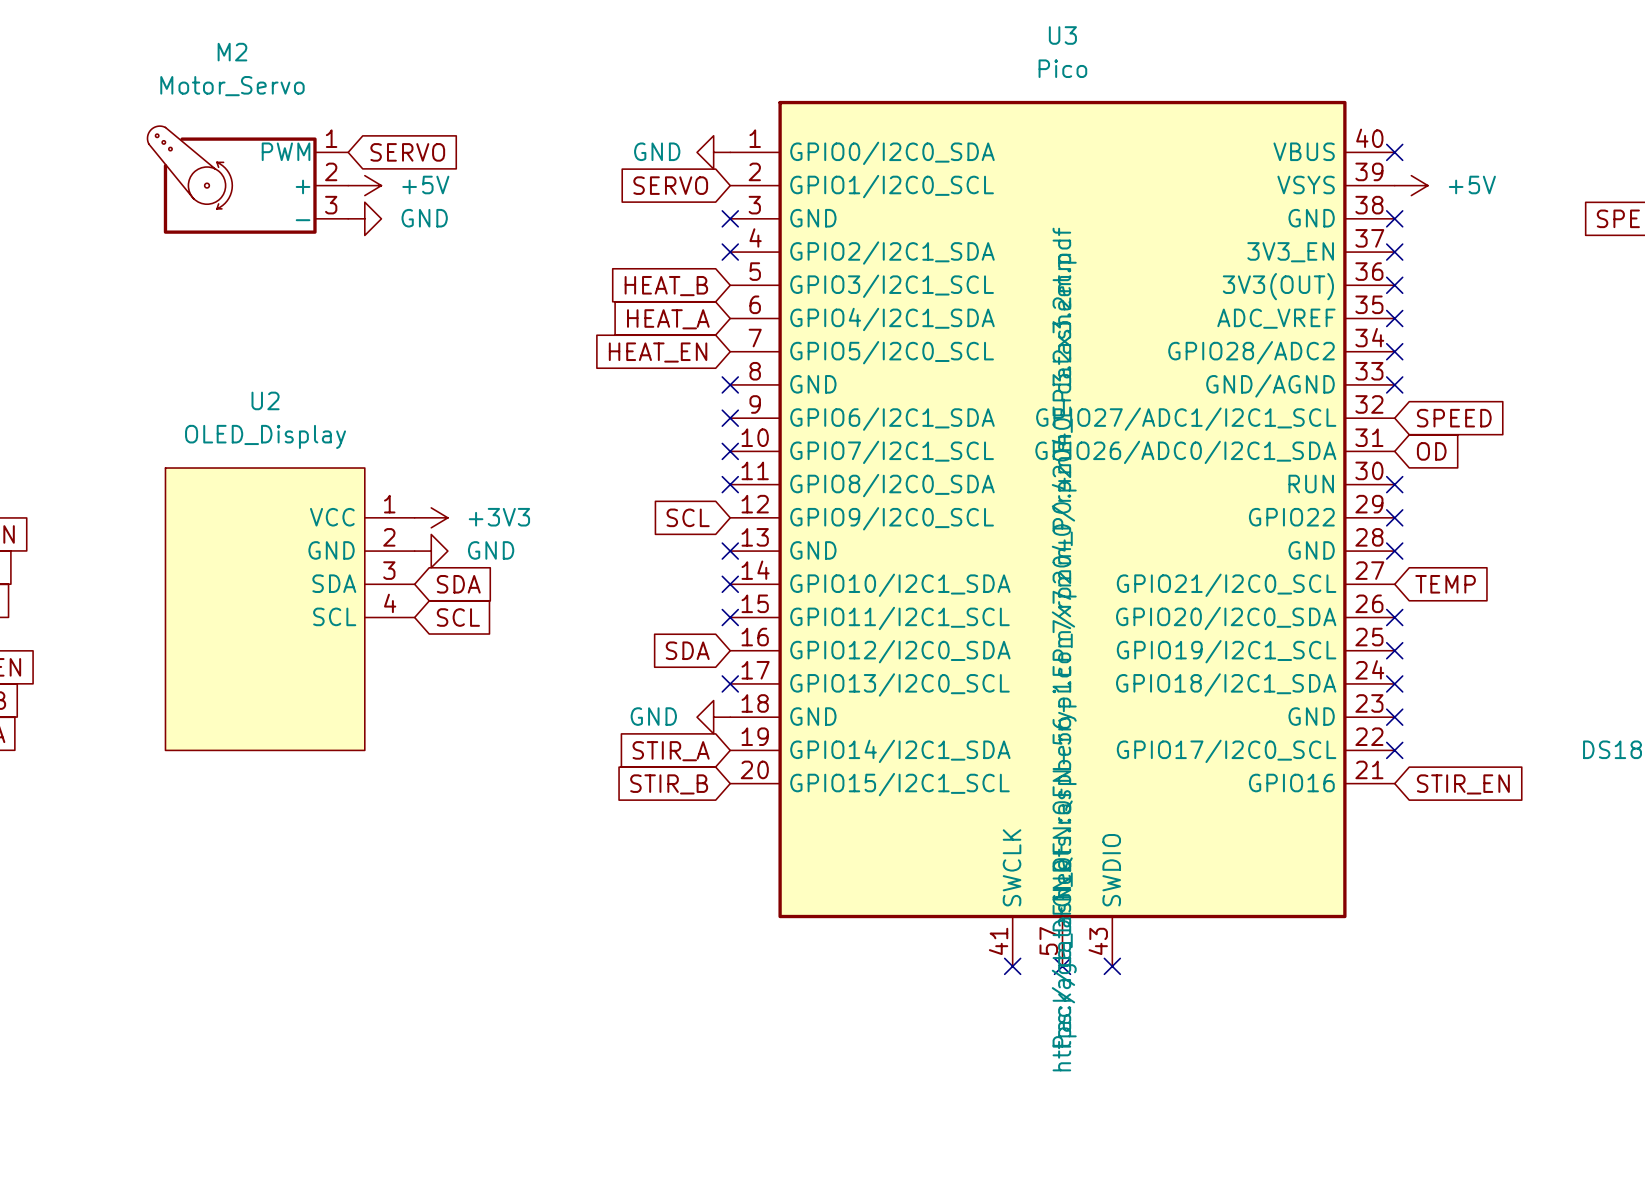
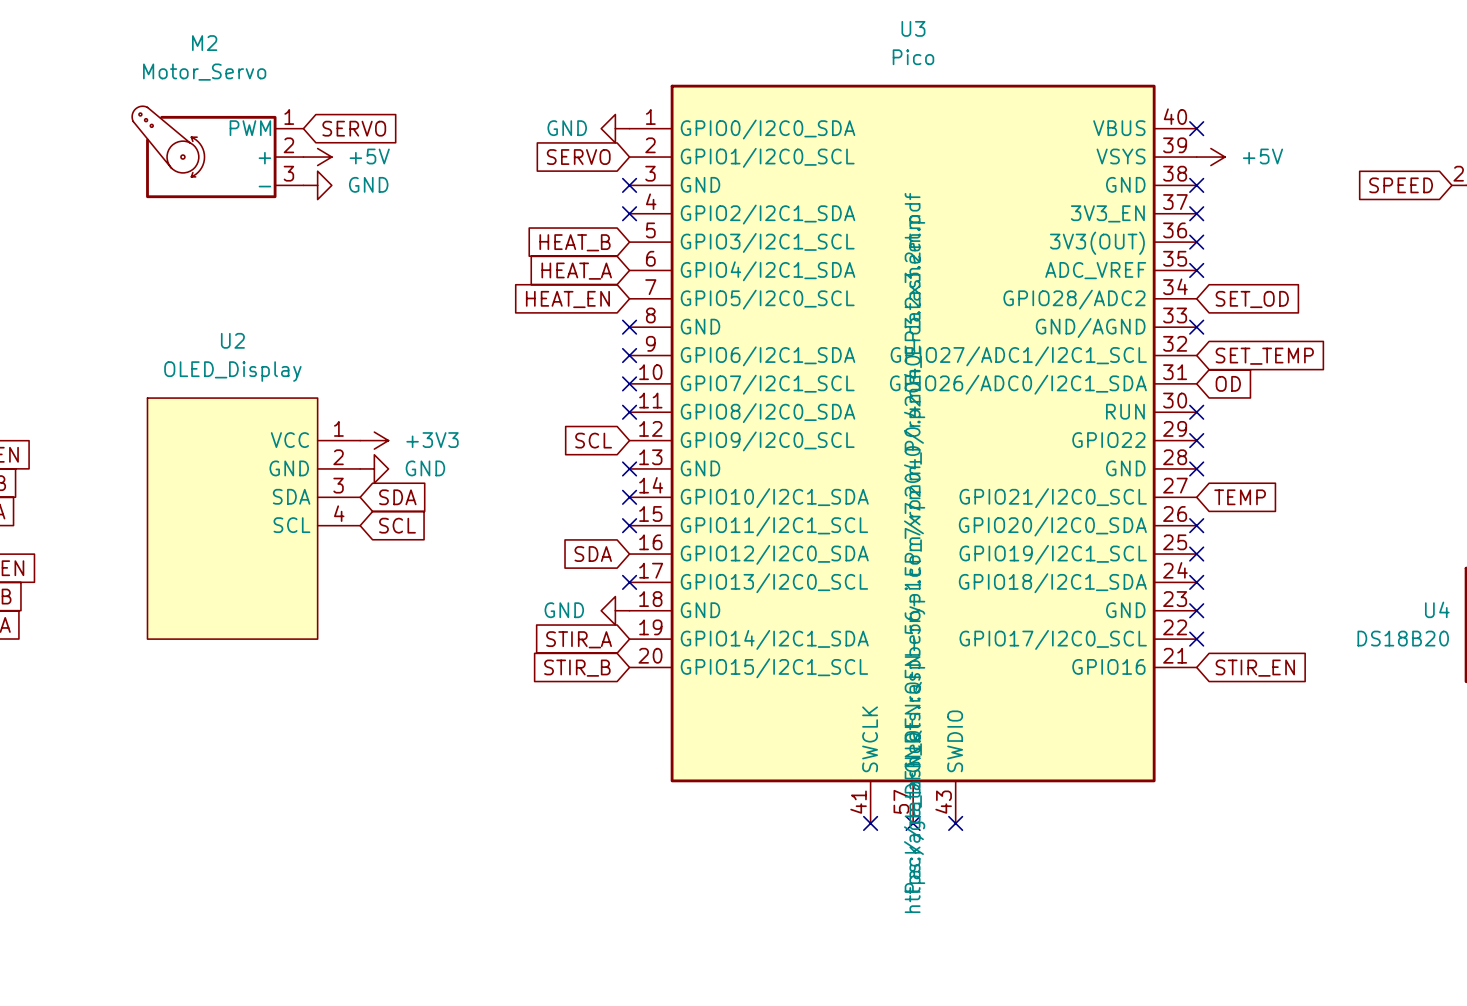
no-connect mark: (1394, 351) -> none
global label: none -> SET_OD (1252, 299)
global label: SPEED (1454, 418) -> SET_TEMP (1264, 356)

